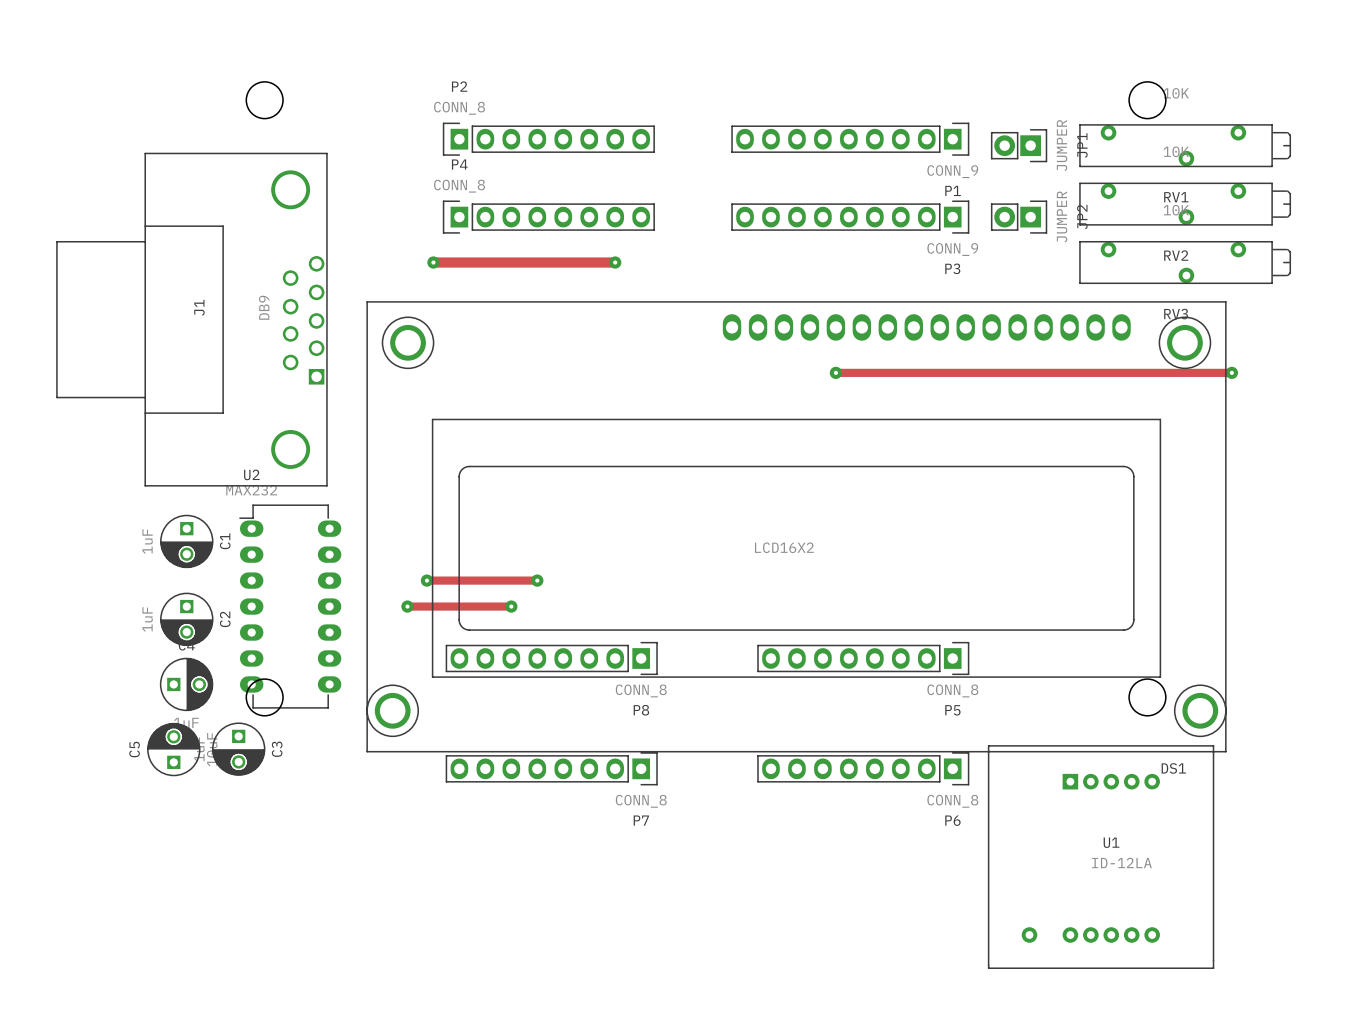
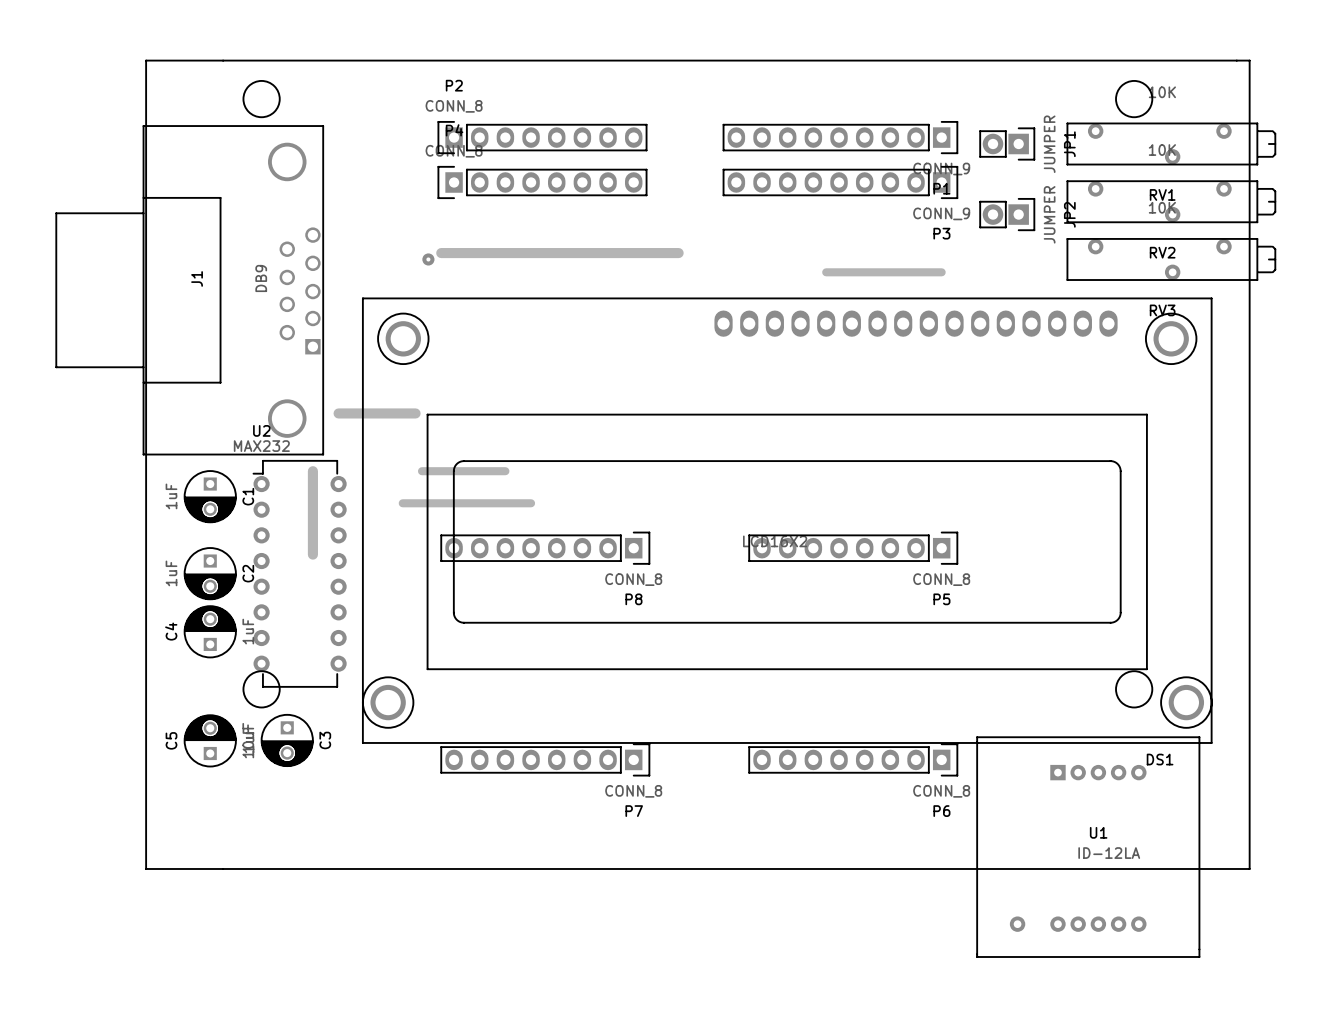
board edge: none -> (146, 60) (1249, 60) (1249, 868) (146, 868) (146, 60)
P4 position: (548, 217) -> (542, 182)
P3 position: (850, 217) -> (840, 182)
track: none -> (441, 253) (678, 253)
track: (433, 262) (615, 262) -> none
via: (615, 262) -> none
track: none -> (826, 272) (941, 272)
J1 position: (191, 319) -> (189, 290)
track: (835, 372) (1231, 372) -> none
via: (835, 372) -> none
via: (1231, 372) -> none
track: none -> (338, 413) (415, 413)
track: none -> (312, 471) (312, 554)
track: none -> (421, 471) (505, 471)
U2 footprint: [239, 504, 342, 709] -> [252, 460, 347, 688]
track: none -> (402, 503) (531, 503)
C1 position: (186, 541) -> (210, 496)
track: (426, 580) (537, 580) -> none
via: (426, 580) -> none
via: (537, 580) -> none
track: (407, 606) (511, 606) -> none
via: (407, 606) -> none
via: (511, 606) -> none
C2 position: (186, 619) -> (210, 573)
P8 position: (551, 658) -> (545, 548)
P5 position: (863, 658) -> (853, 548)
C4 rotation: 0° (186, 684) -> 90° counterclockwise (210, 631)
C4 position: (186, 684) -> (210, 631)
C5 position: (173, 749) -> (210, 740)
C3 position: (238, 749) -> (287, 740)

